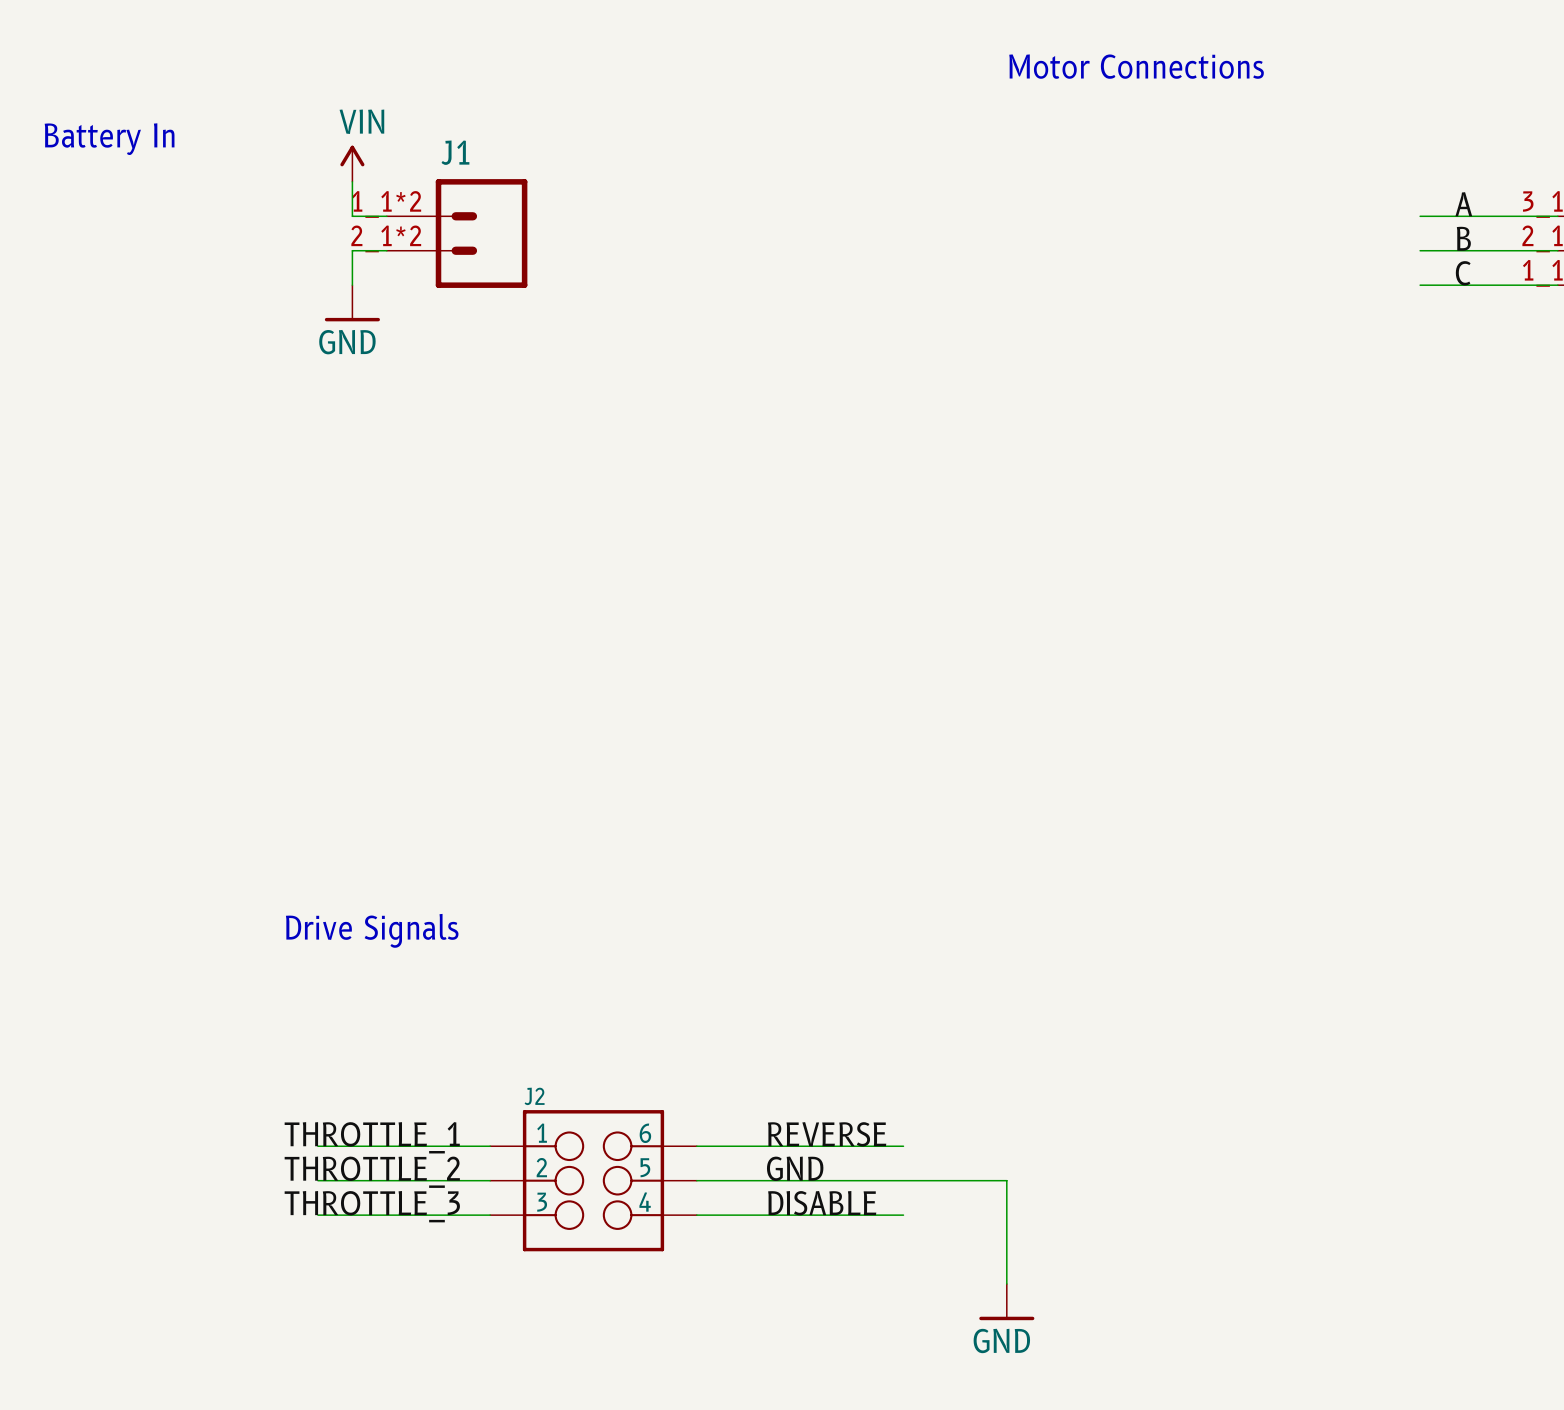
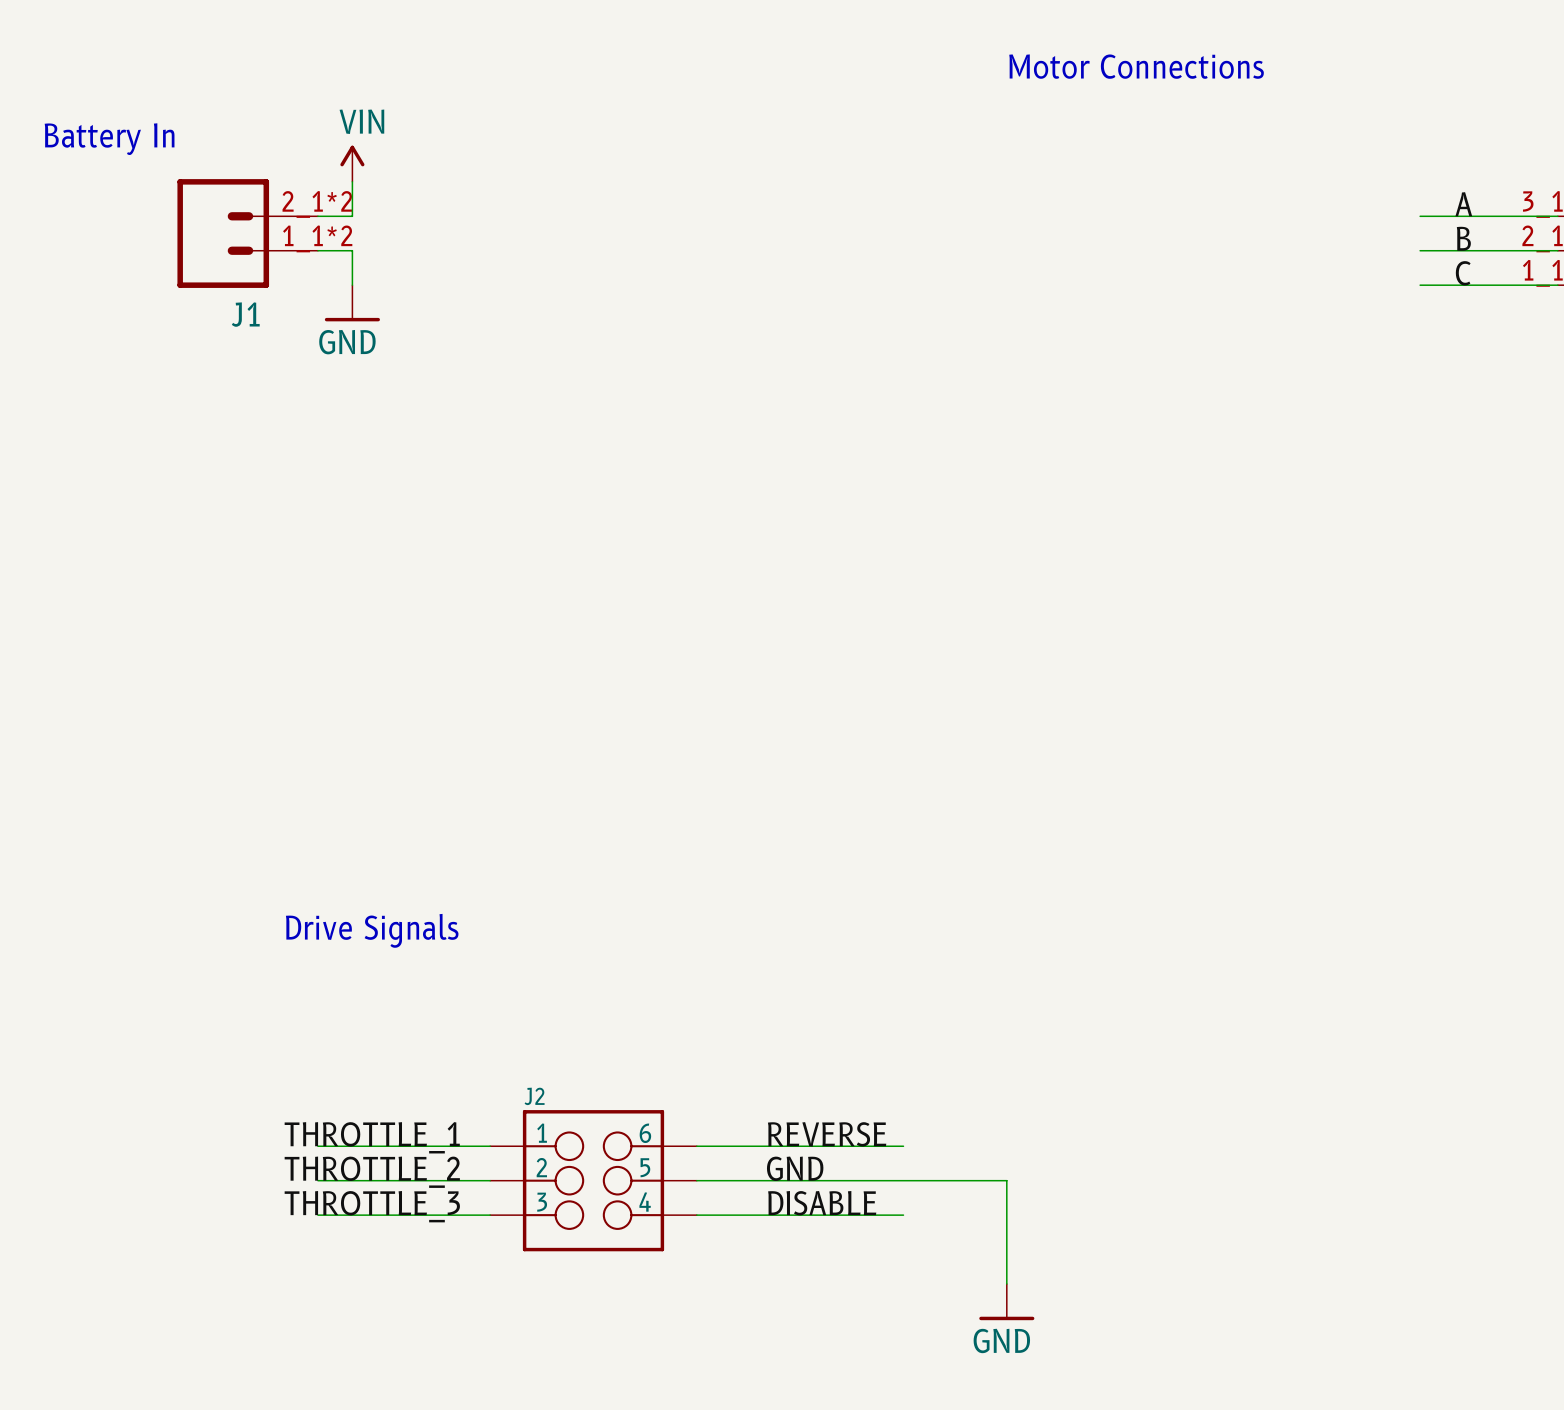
wire: (352, 216) (386, 216) -> (352, 216) (317, 216)
J1 position: (457, 233) -> (247, 233)
J1 rotation: 0° (481, 233) -> 180° (223, 233)
wire: (352, 250) (386, 250) -> (352, 250) (317, 250)

